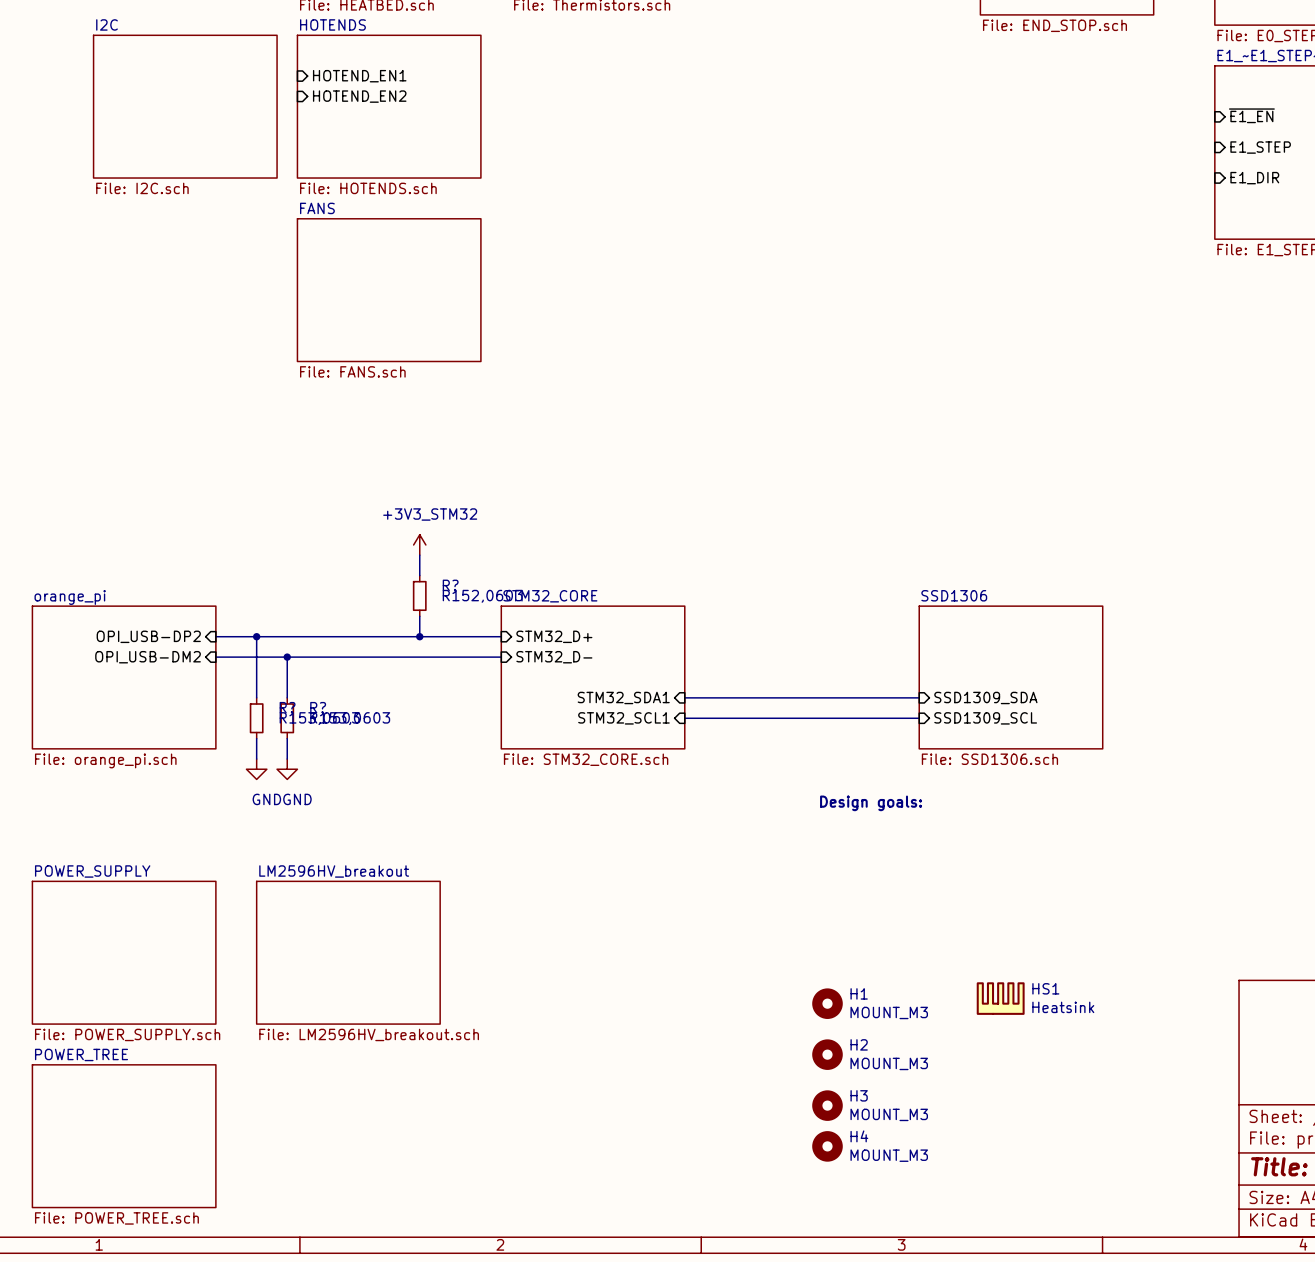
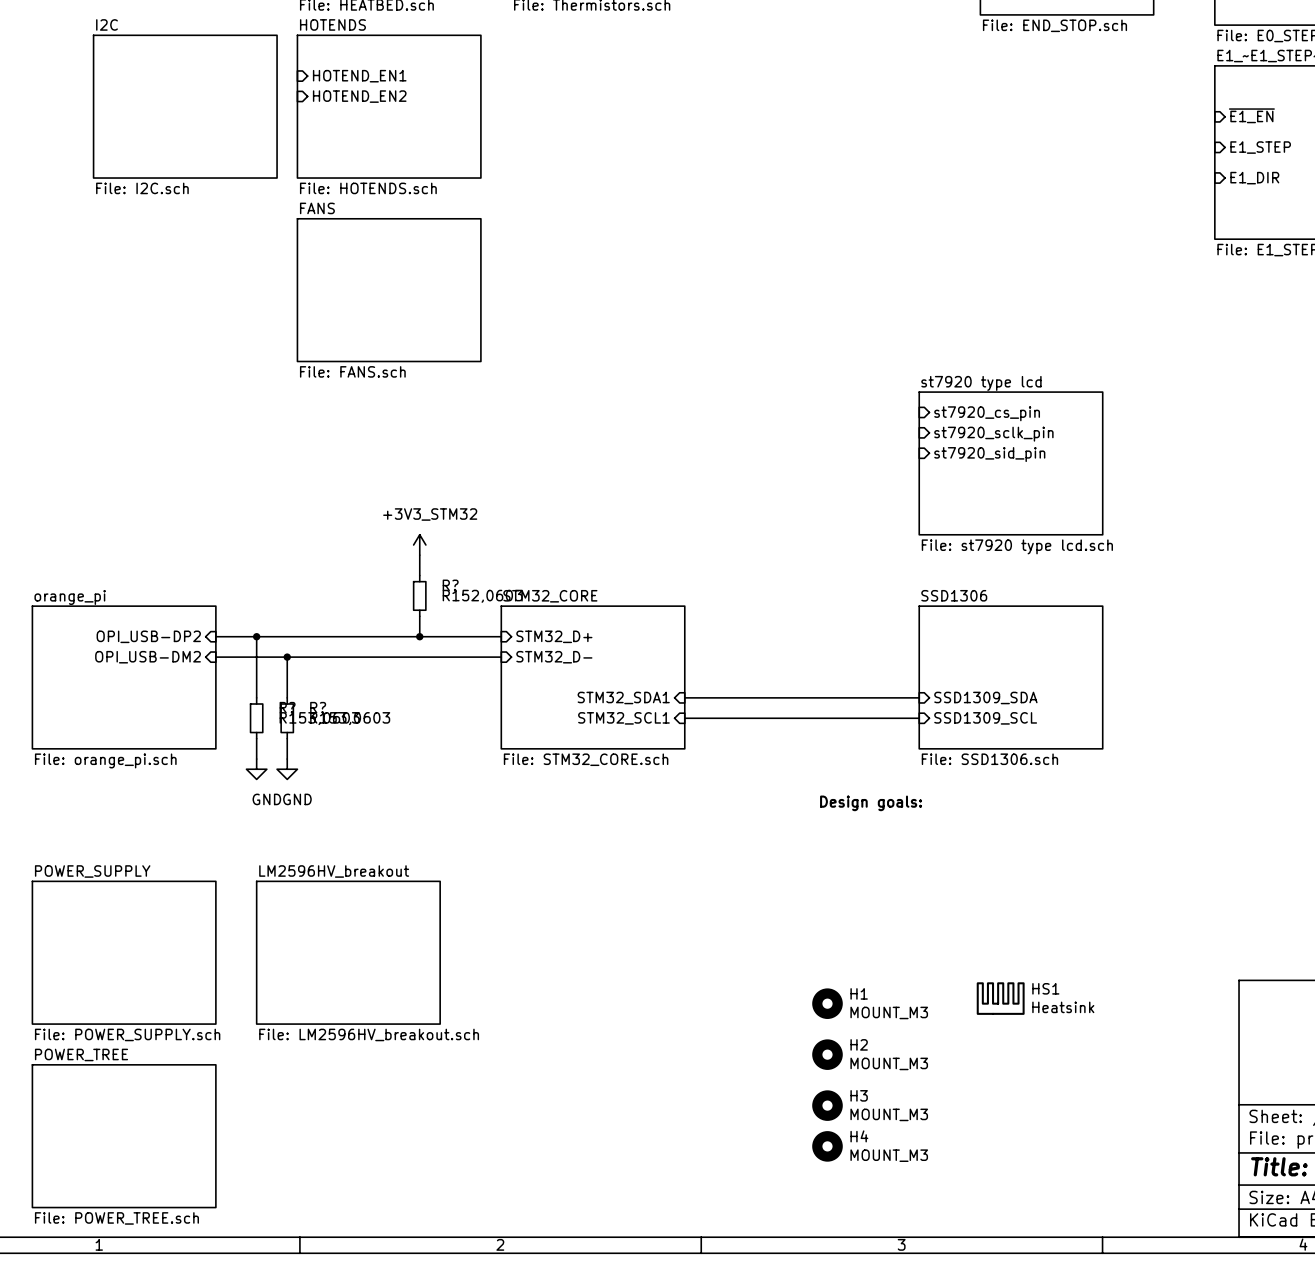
sheet pin: none -> st7920_cs_pin (987, 413)
sheet pin: none -> st7920_sclk_pin (993, 434)
sheet pin: none -> st7920_sid_pin (989, 454)
sheet st7920 type lcd: none -> File: st7920 type lcd.sch (1010, 463)

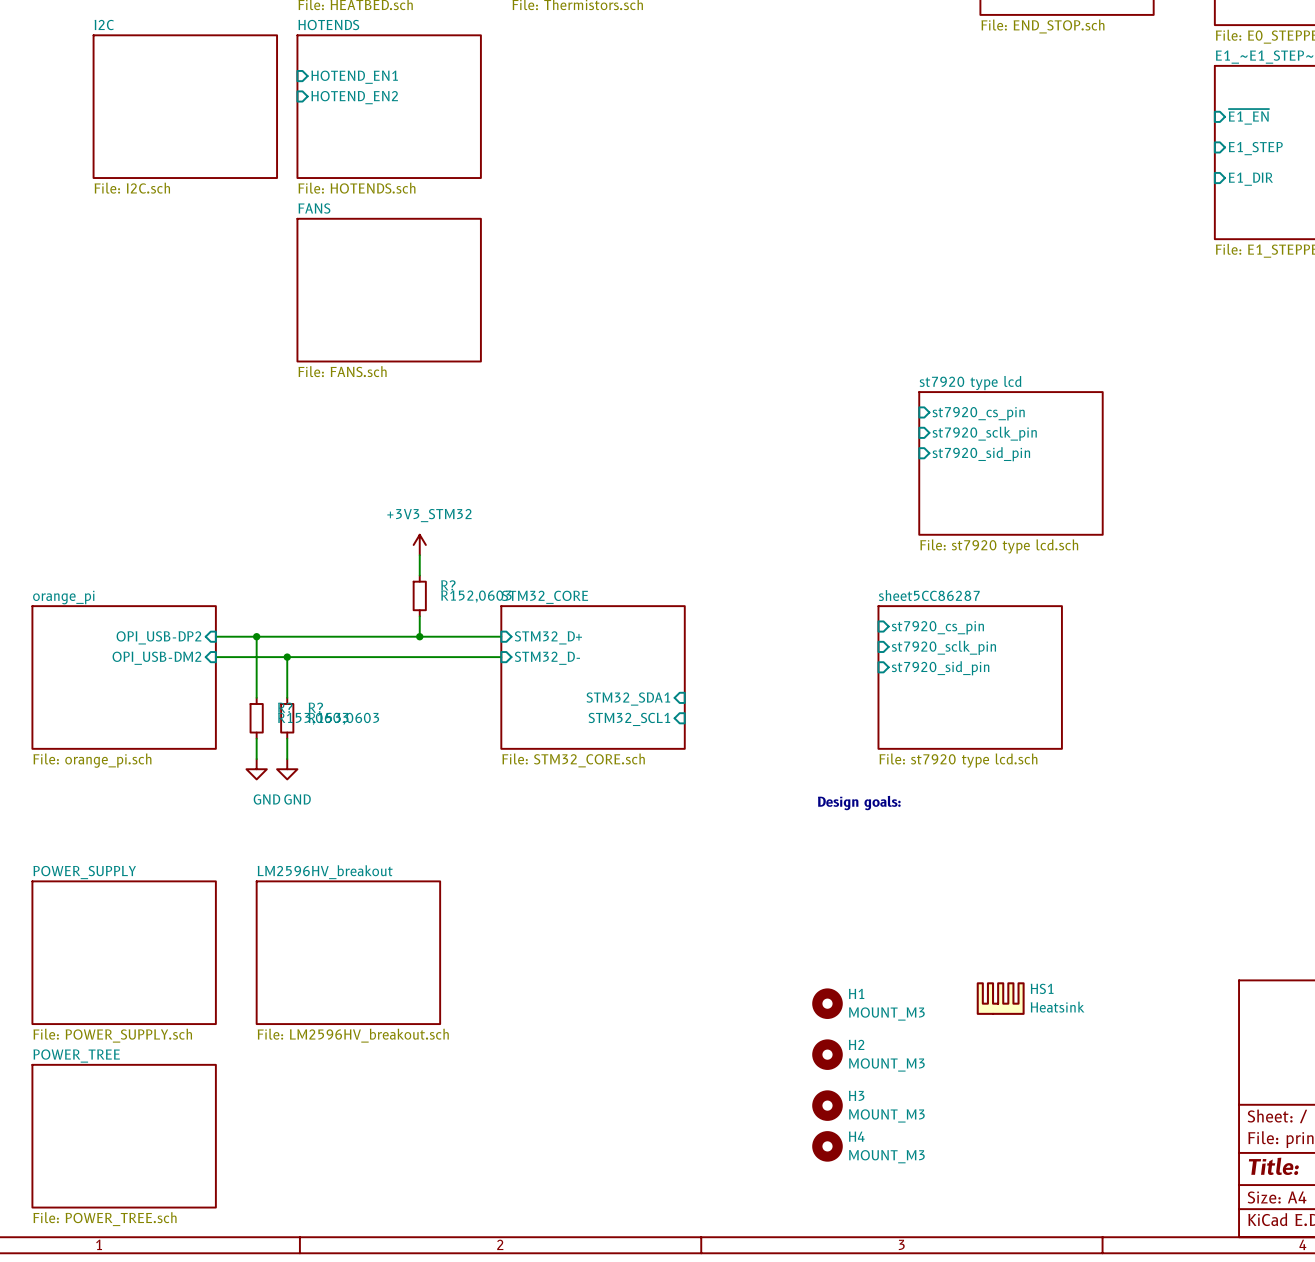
sheet pin: none -> st7920_cs_pin (937, 627)
sheet pin: none -> st7920_sclk_pin (943, 647)
sheet pin: none -> st7920_sid_pin (940, 668)
sheet sheet5CC86287: none -> File: st7920 type lcd.sch (970, 677)
sheet SSD1306: File: SSD1306.sch (1010, 677) -> none
wire: (684, 697) (919, 697) -> none
sheet pin: SSD1309_SDA (985, 697) -> none
wire: (684, 718) (919, 718) -> none
sheet pin: SSD1309_SCL (985, 718) -> none

